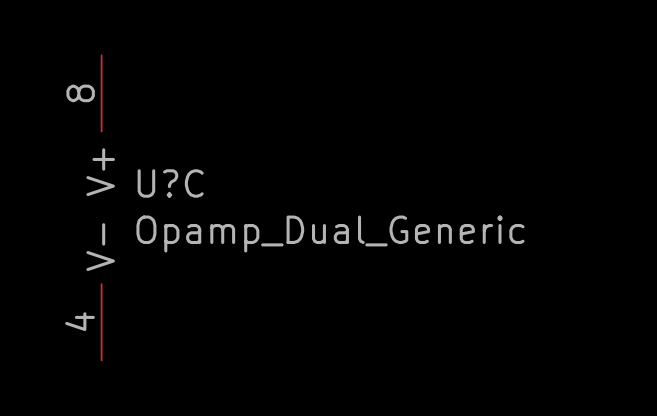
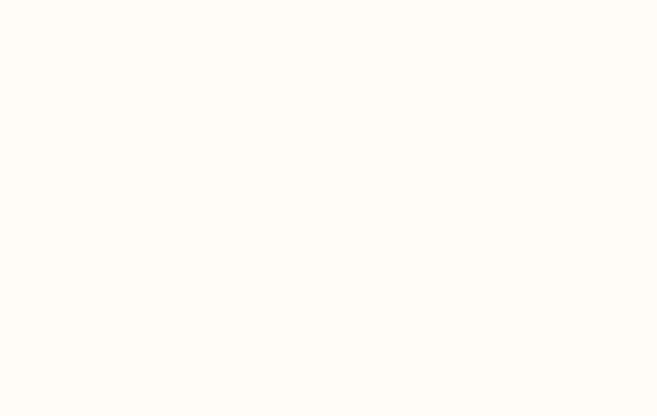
U?C: Opamp_Dual_Generic (101, 207) -> none

